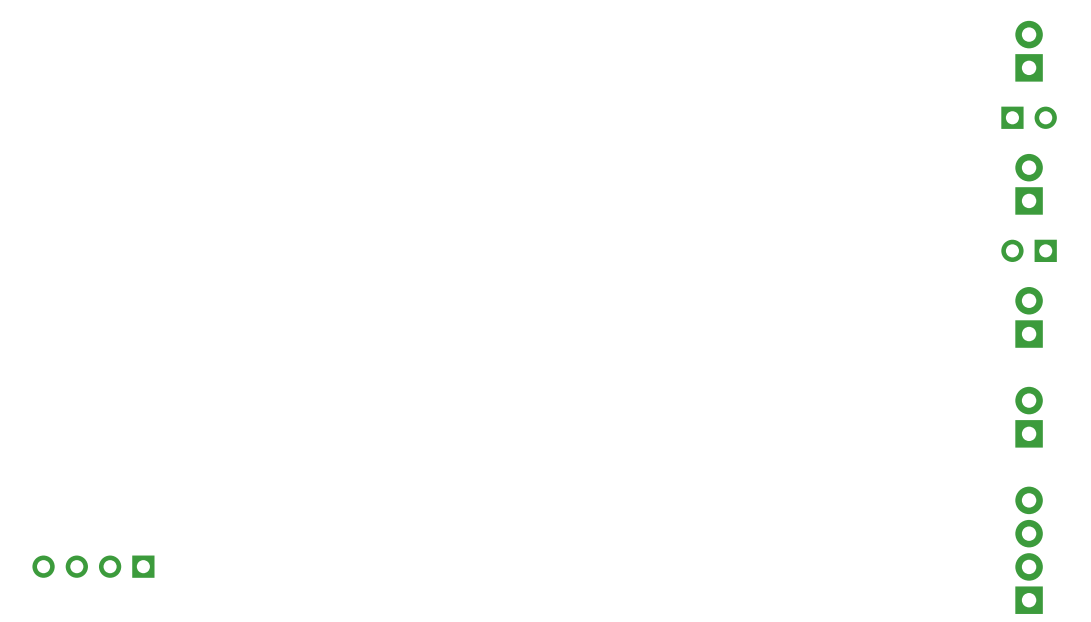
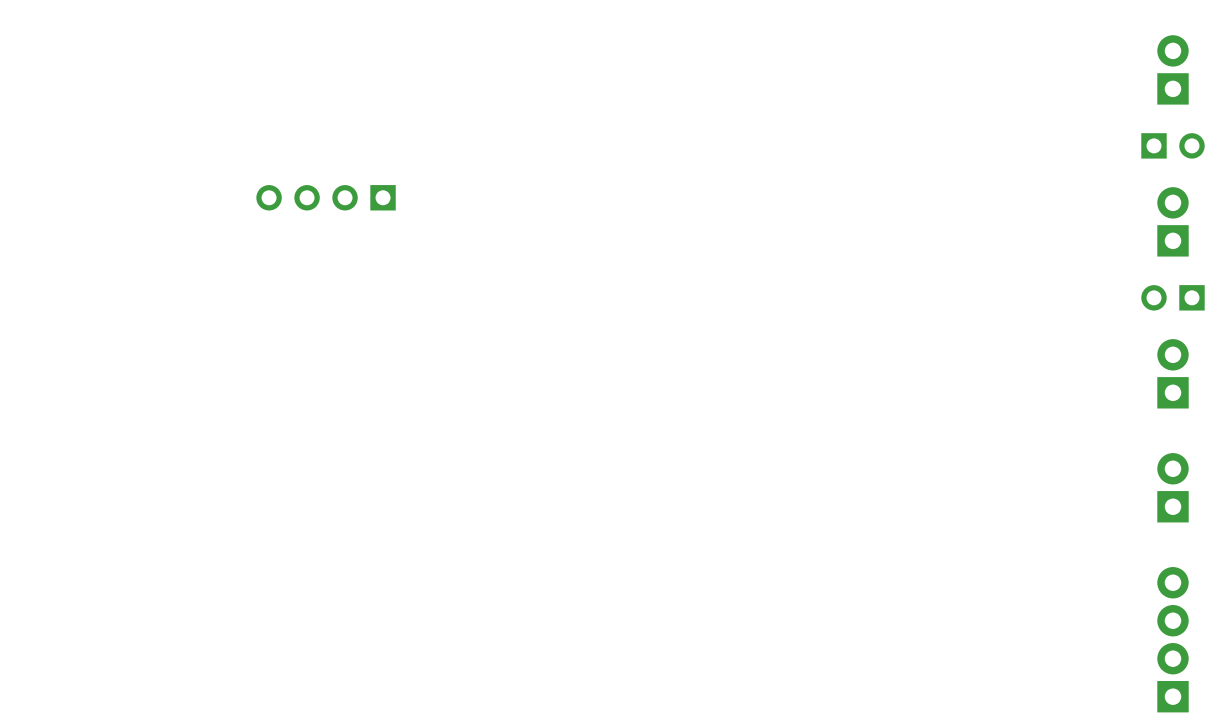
part: none -> (326, 197)
part: (93, 566) -> none

